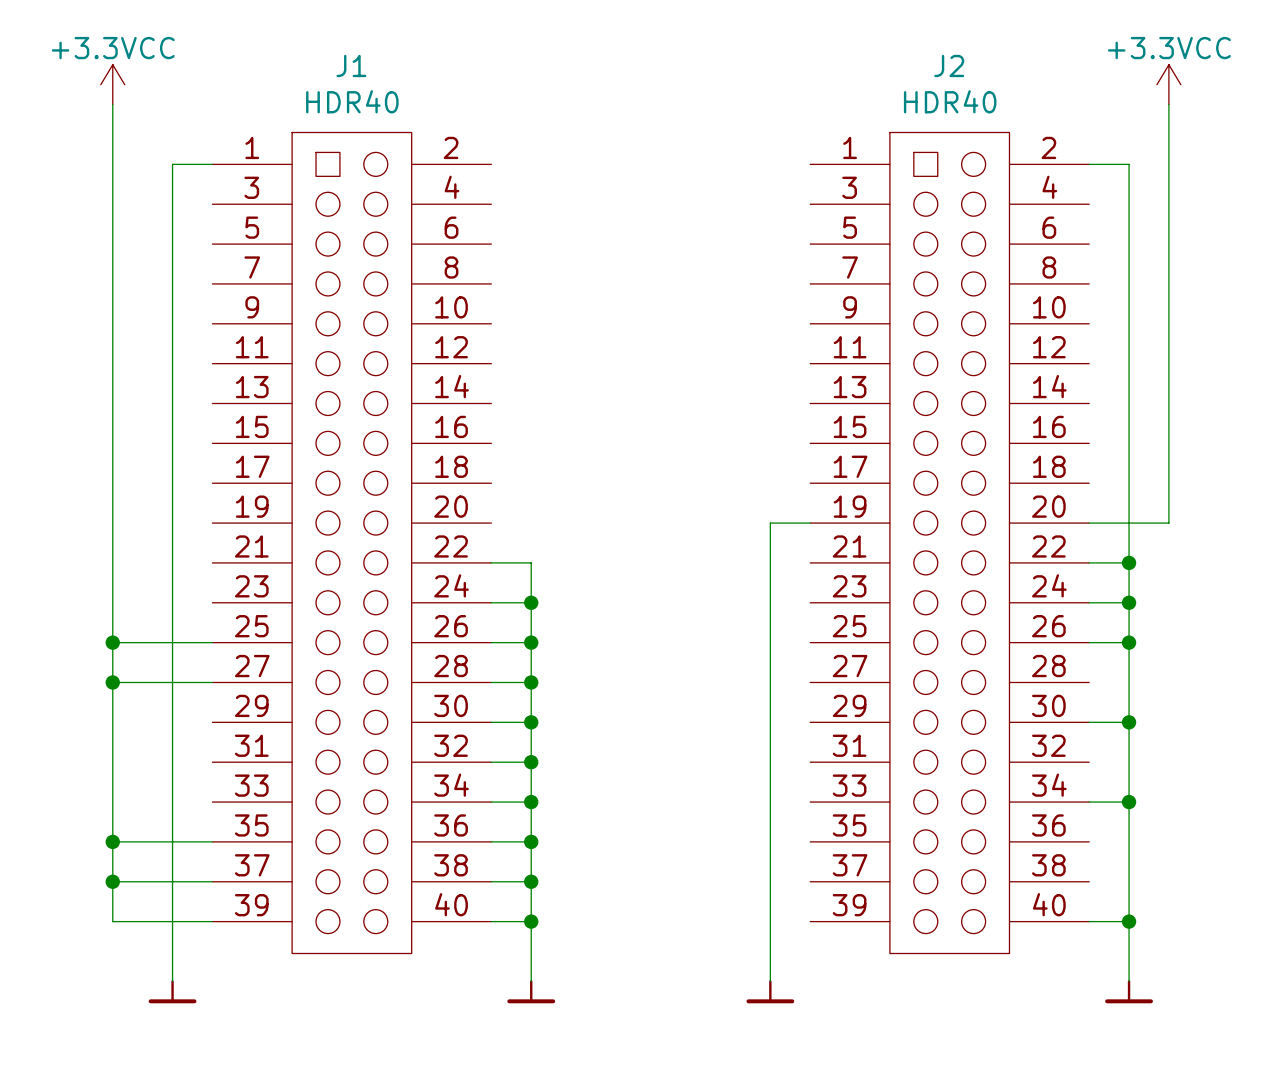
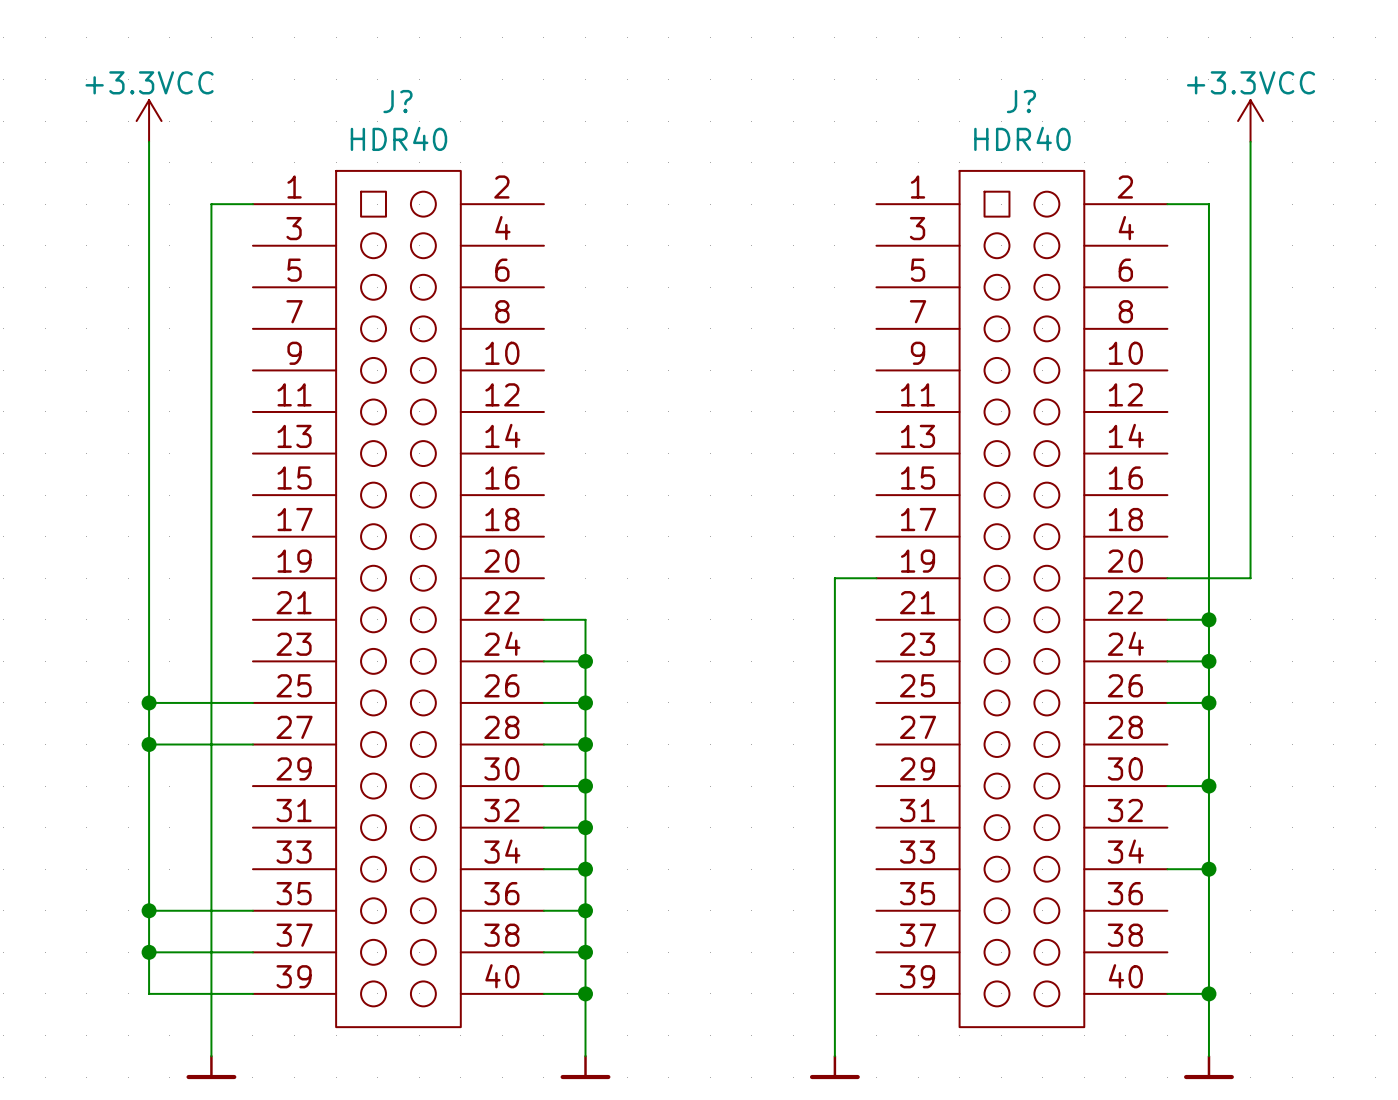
J1 name: J1 (351, 65) -> J? (397, 101)
J2 name: J2 (949, 65) -> J? (1021, 101)

